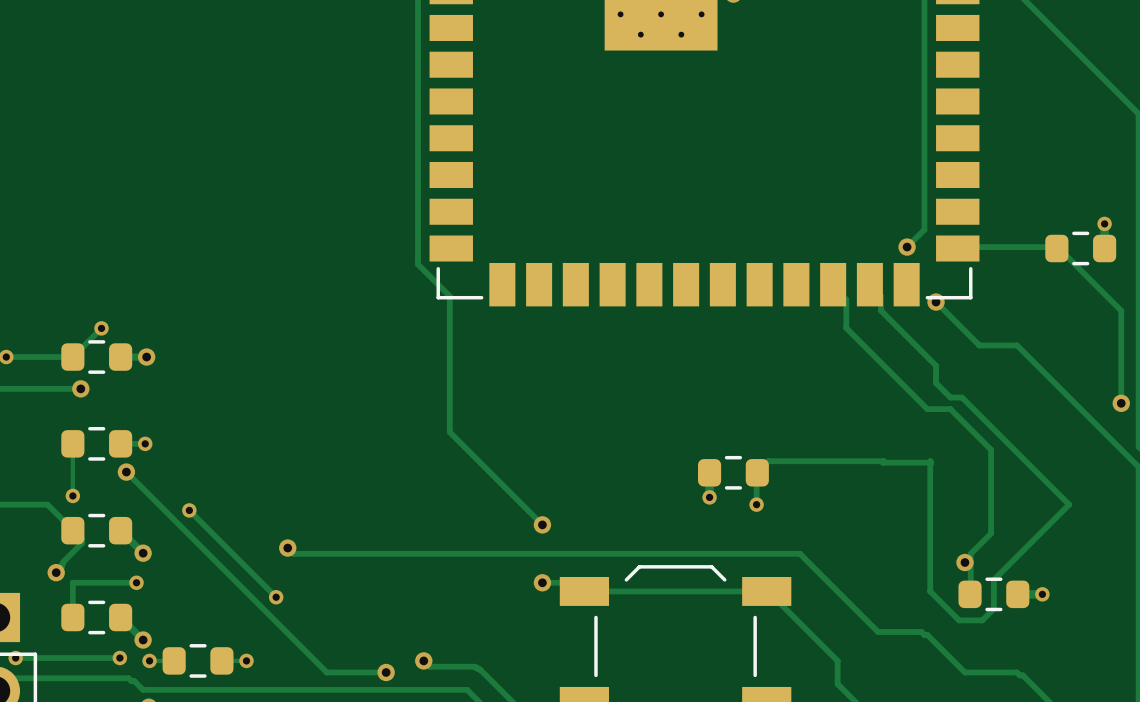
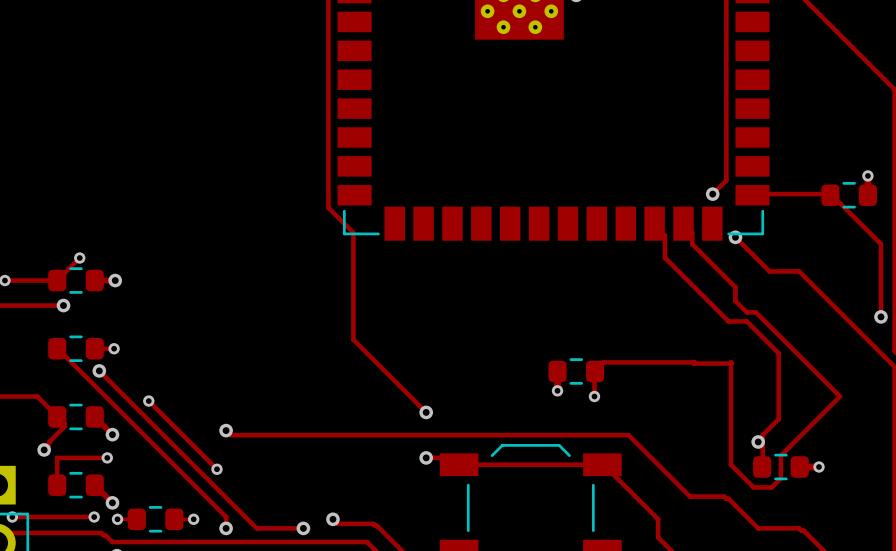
track: (72, 443) (72, 495) -> (57, 348) (226, 517) (226, 528)
via: (72, 495) -> none
via: none -> (226, 528)

